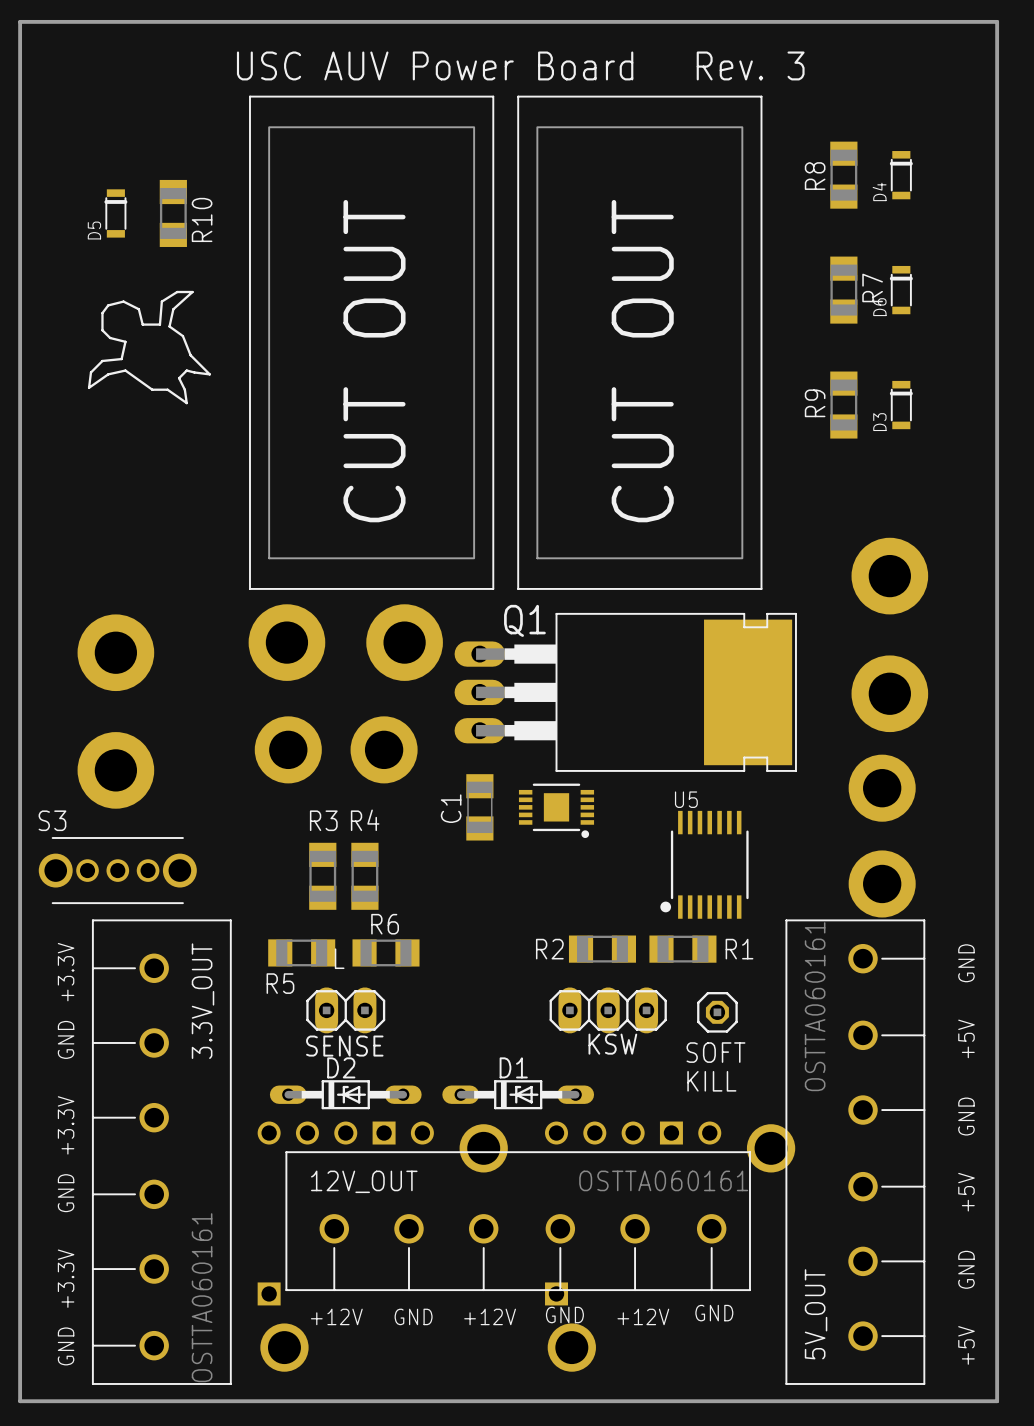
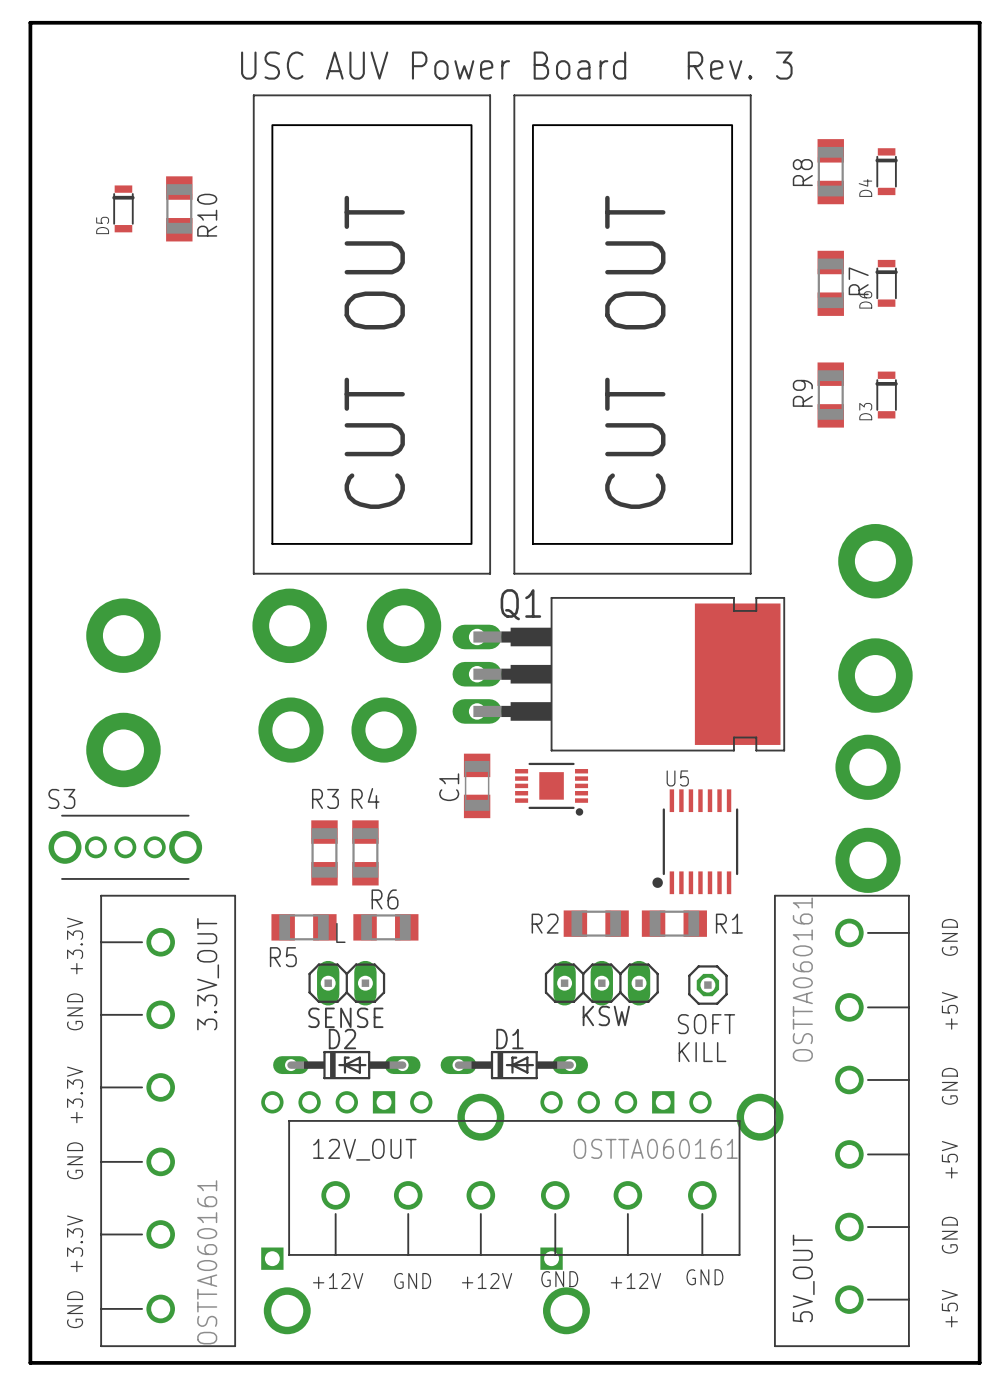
line: (177, 292) (192, 292) (173, 309) (169, 326) (182, 336) (190, 355) (209, 374) (186, 370) (179, 378) (184, 389) (186, 403) (167, 389) (152, 389) (125, 370) (108, 374) (89, 387) (90, 372) (102, 360) (121, 359) (125, 341) (110, 337) (102, 330) (102, 313) (108, 305) (123, 301) (138, 309) (142, 324) (159, 324) (161, 301) (177, 292) -> none

